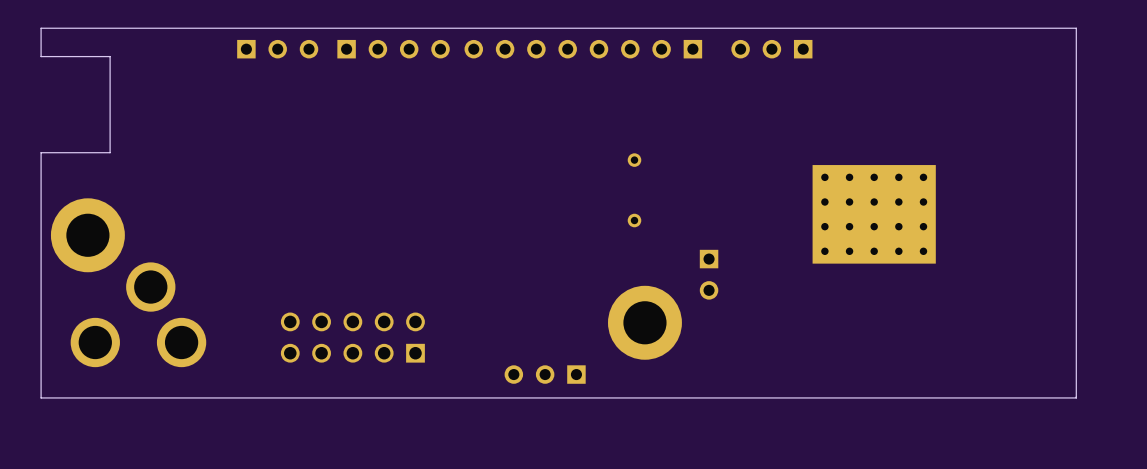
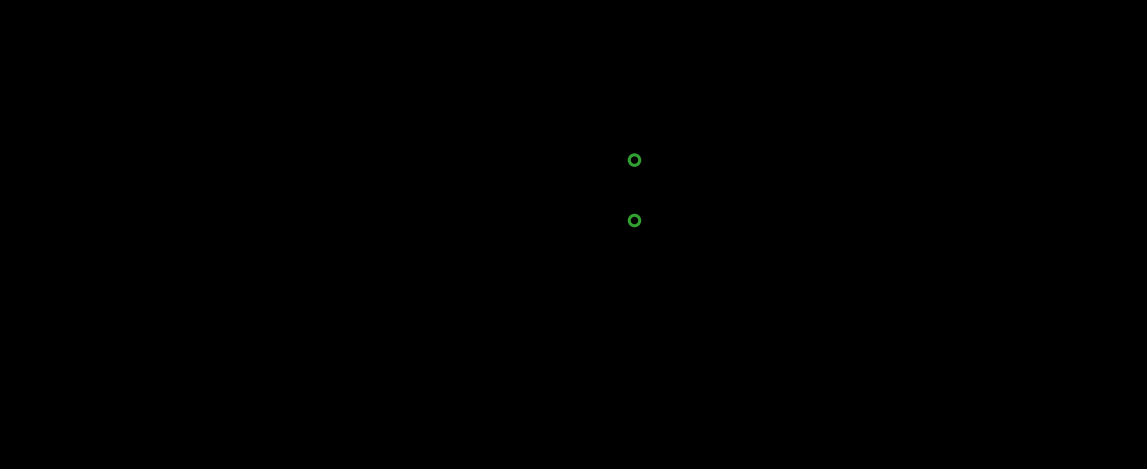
board edge: (1076, 28) (1076, 397) (41, 397) (41, 152) (110, 152) (110, 56) (41, 56) (41, 28) (1076, 28) -> none
part: (277, 49) -> none
part: (393, 49) -> none
part: (583, 49) -> none
part: (771, 49) -> none
part: (874, 214) -> none
part: (87, 235) -> none
part: (709, 274) -> none
part: (138, 314) -> none
part: (644, 322) -> none
part: (352, 337) -> none
part: (545, 374) -> none

